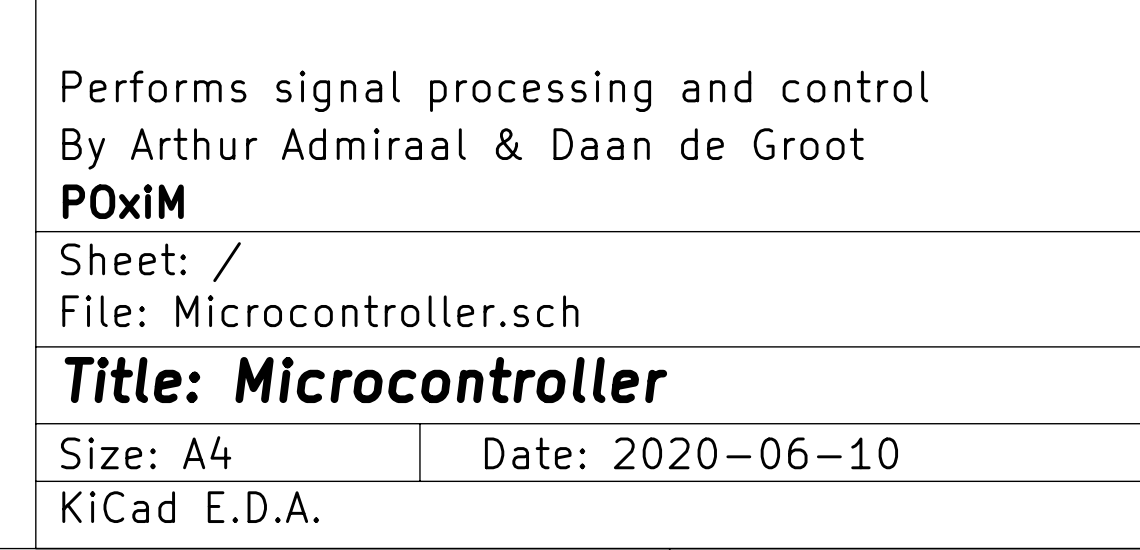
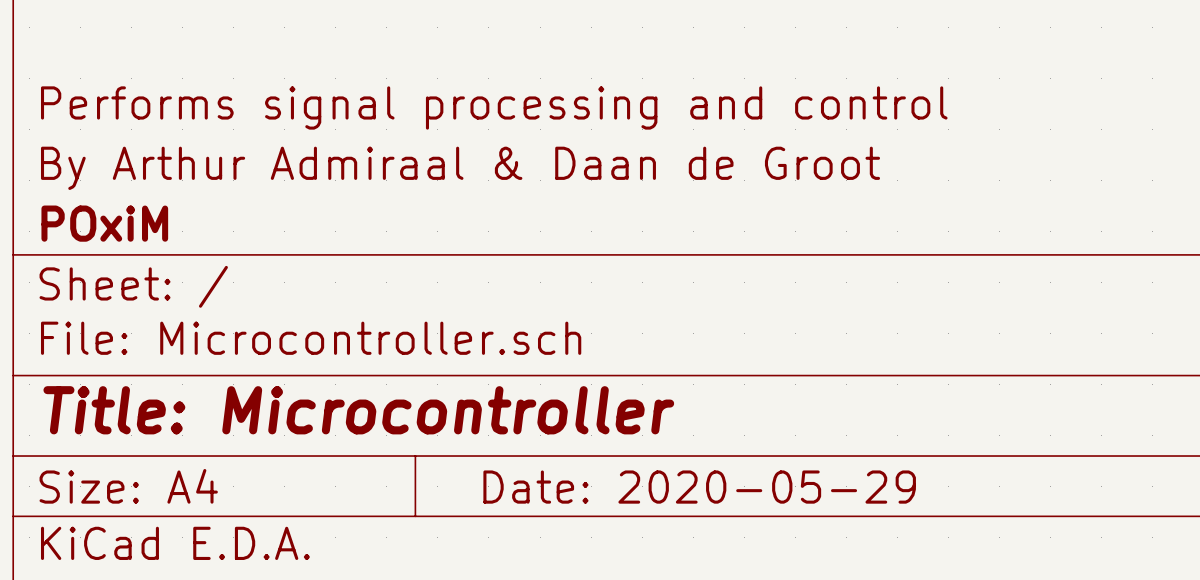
title block: Date: 2020-06-10 (691, 453) -> Date: 2020-05-29 (699, 487)

